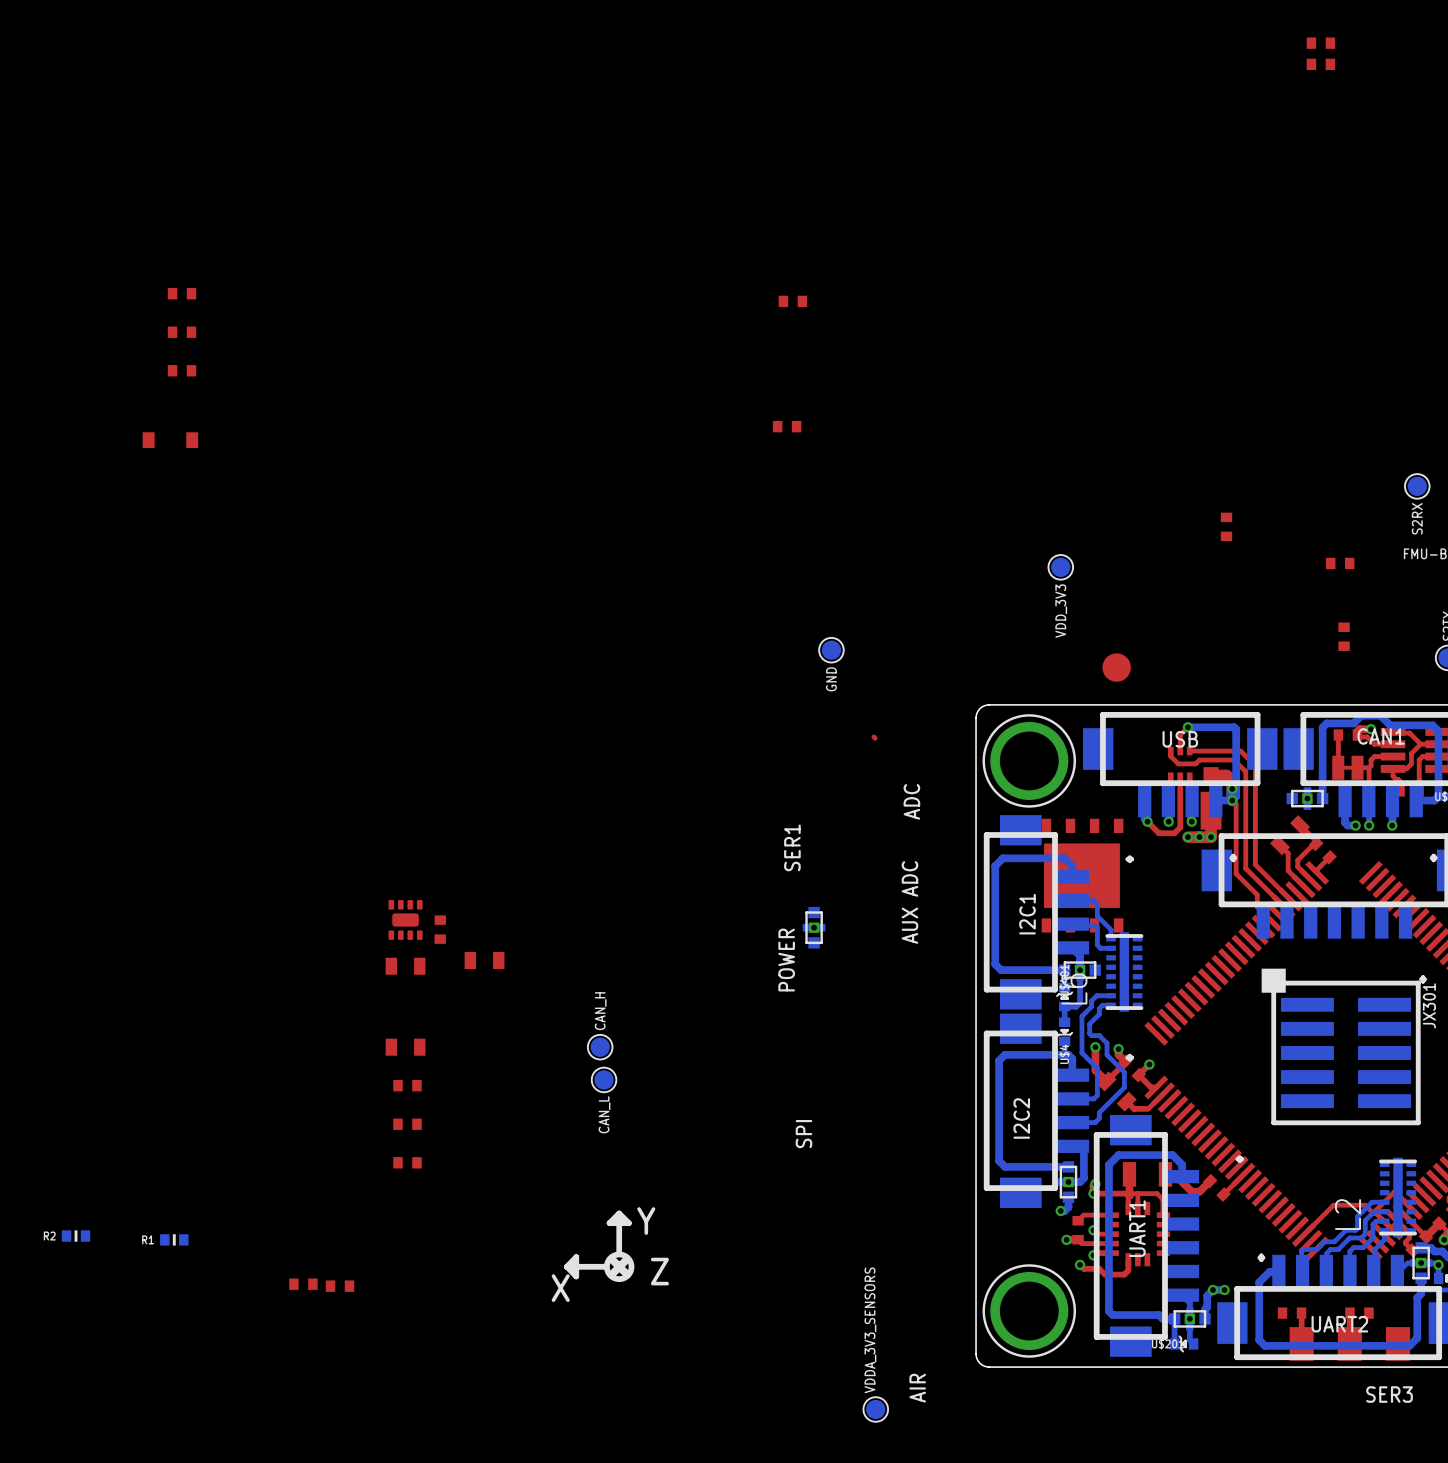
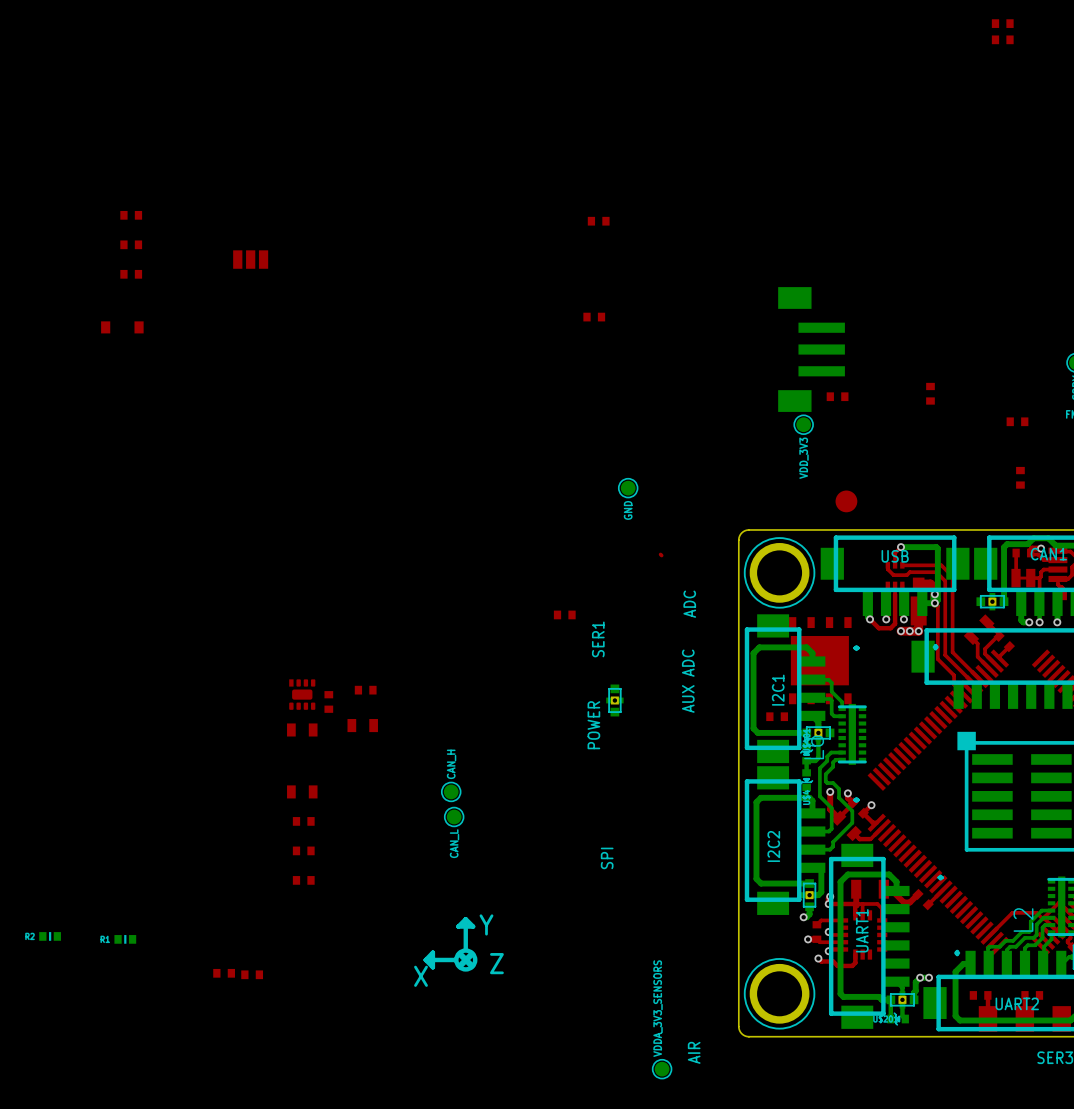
part: none -> (250, 259)
part: none -> (811, 349)
part: none -> (837, 396)
part: none -> (564, 614)
part: none -> (365, 690)
part: none -> (777, 716)

